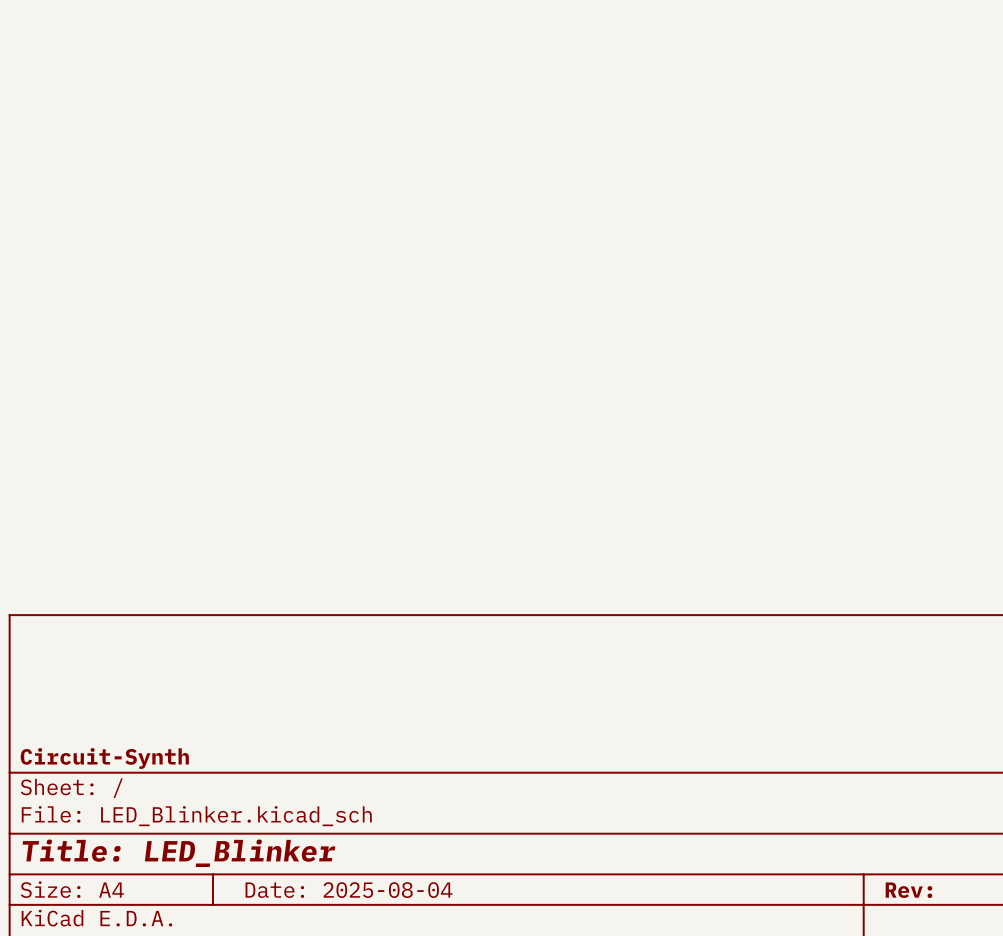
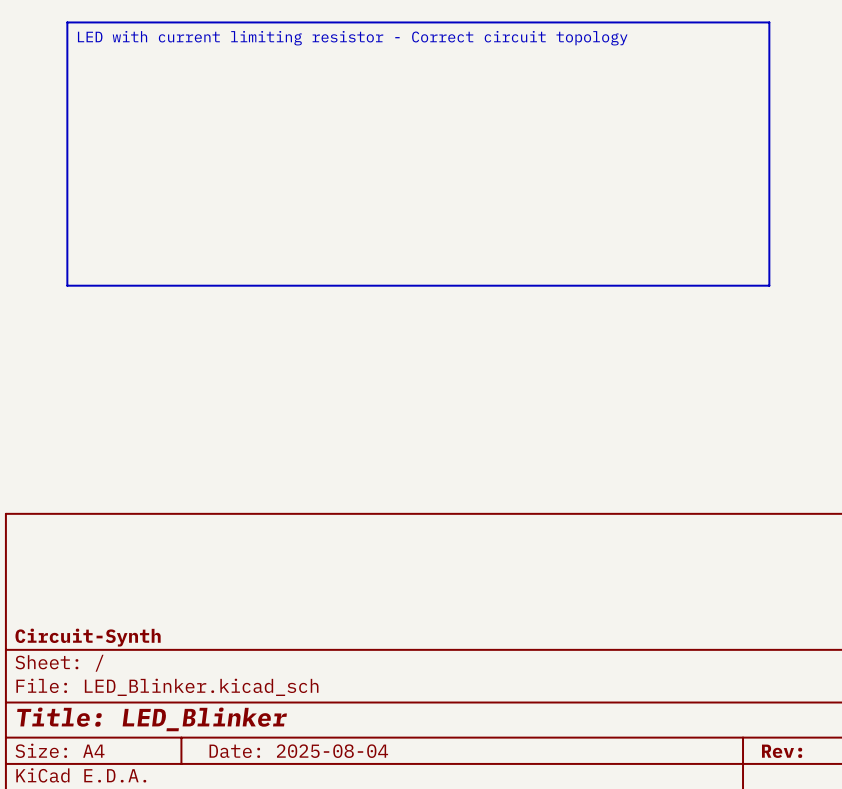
line: none -> (67, 22) (769, 22) (769, 285) (67, 285) (67, 22)
text: none -> LED with current limiting resistor - Correct circuit topology (352, 38)

